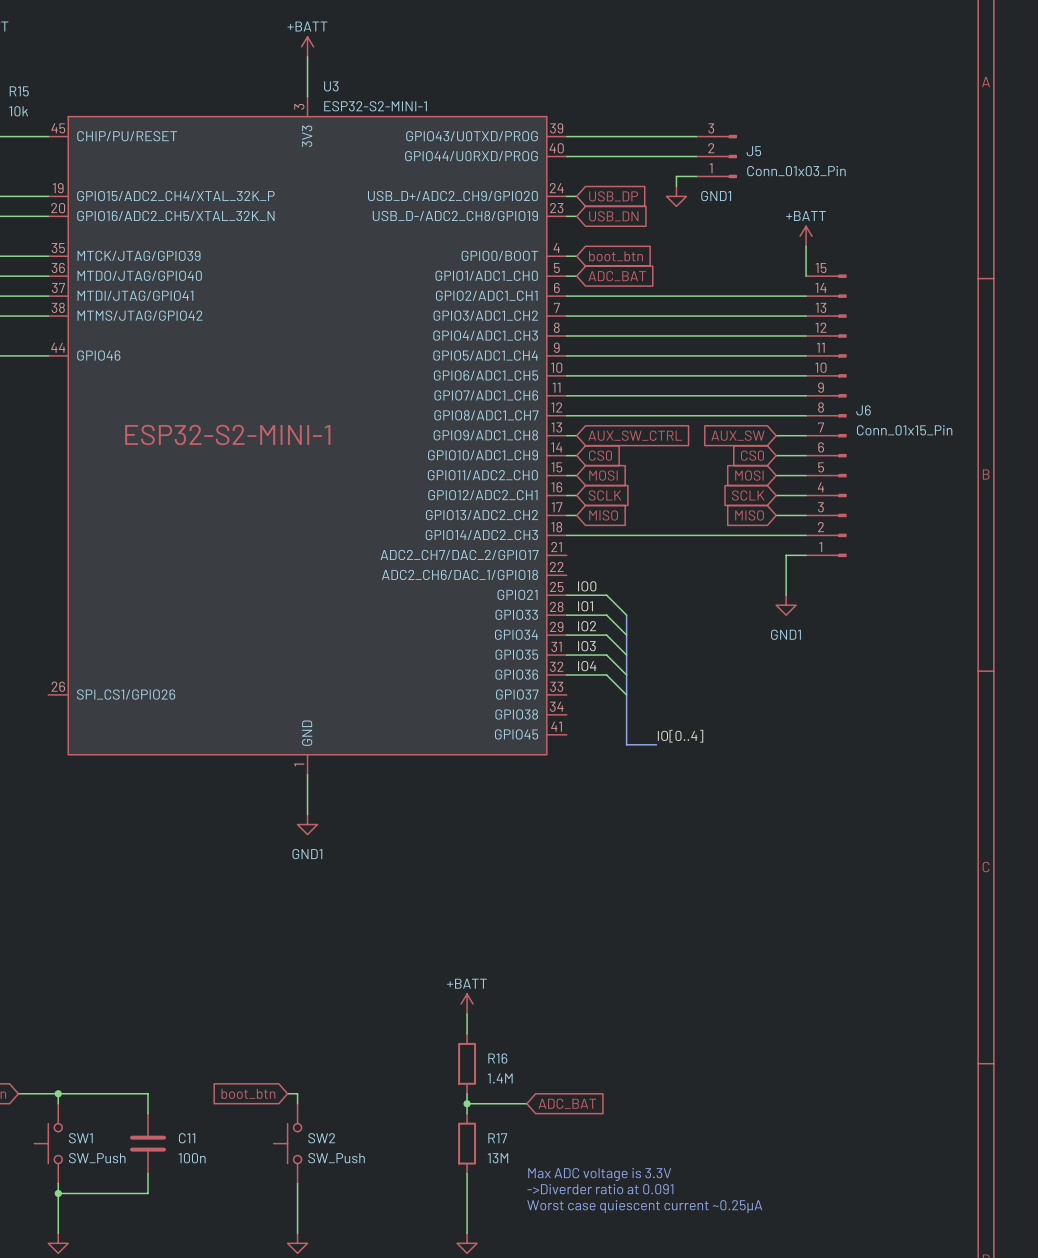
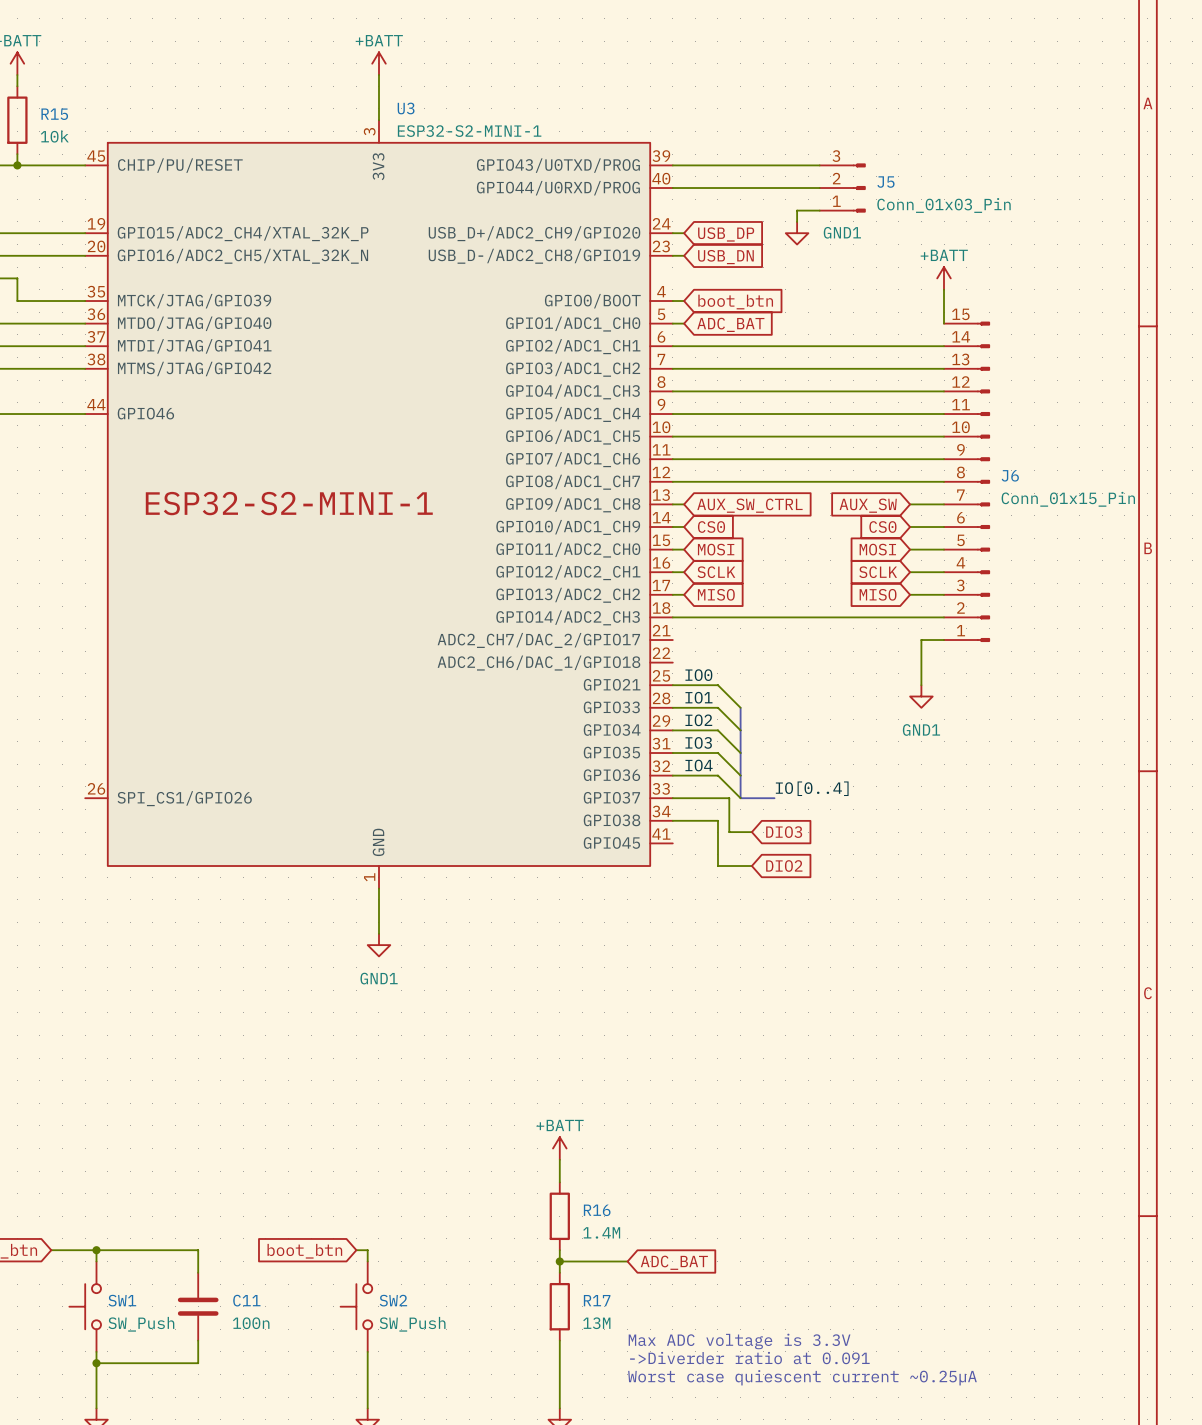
wire: none -> (672, 798) (729, 798) (729, 832) (751, 832)
bus: (626, 694) (626, 744) (656, 744) -> (740, 798) (774, 798)
wire: none -> (672, 820) (717, 820) (717, 866) (751, 866)
global label: none -> DIO3 (784, 832)
label position: IO[0..4] (680, 736) -> IO[0..4] (812, 788)
global label: none -> DIO2 (784, 866)

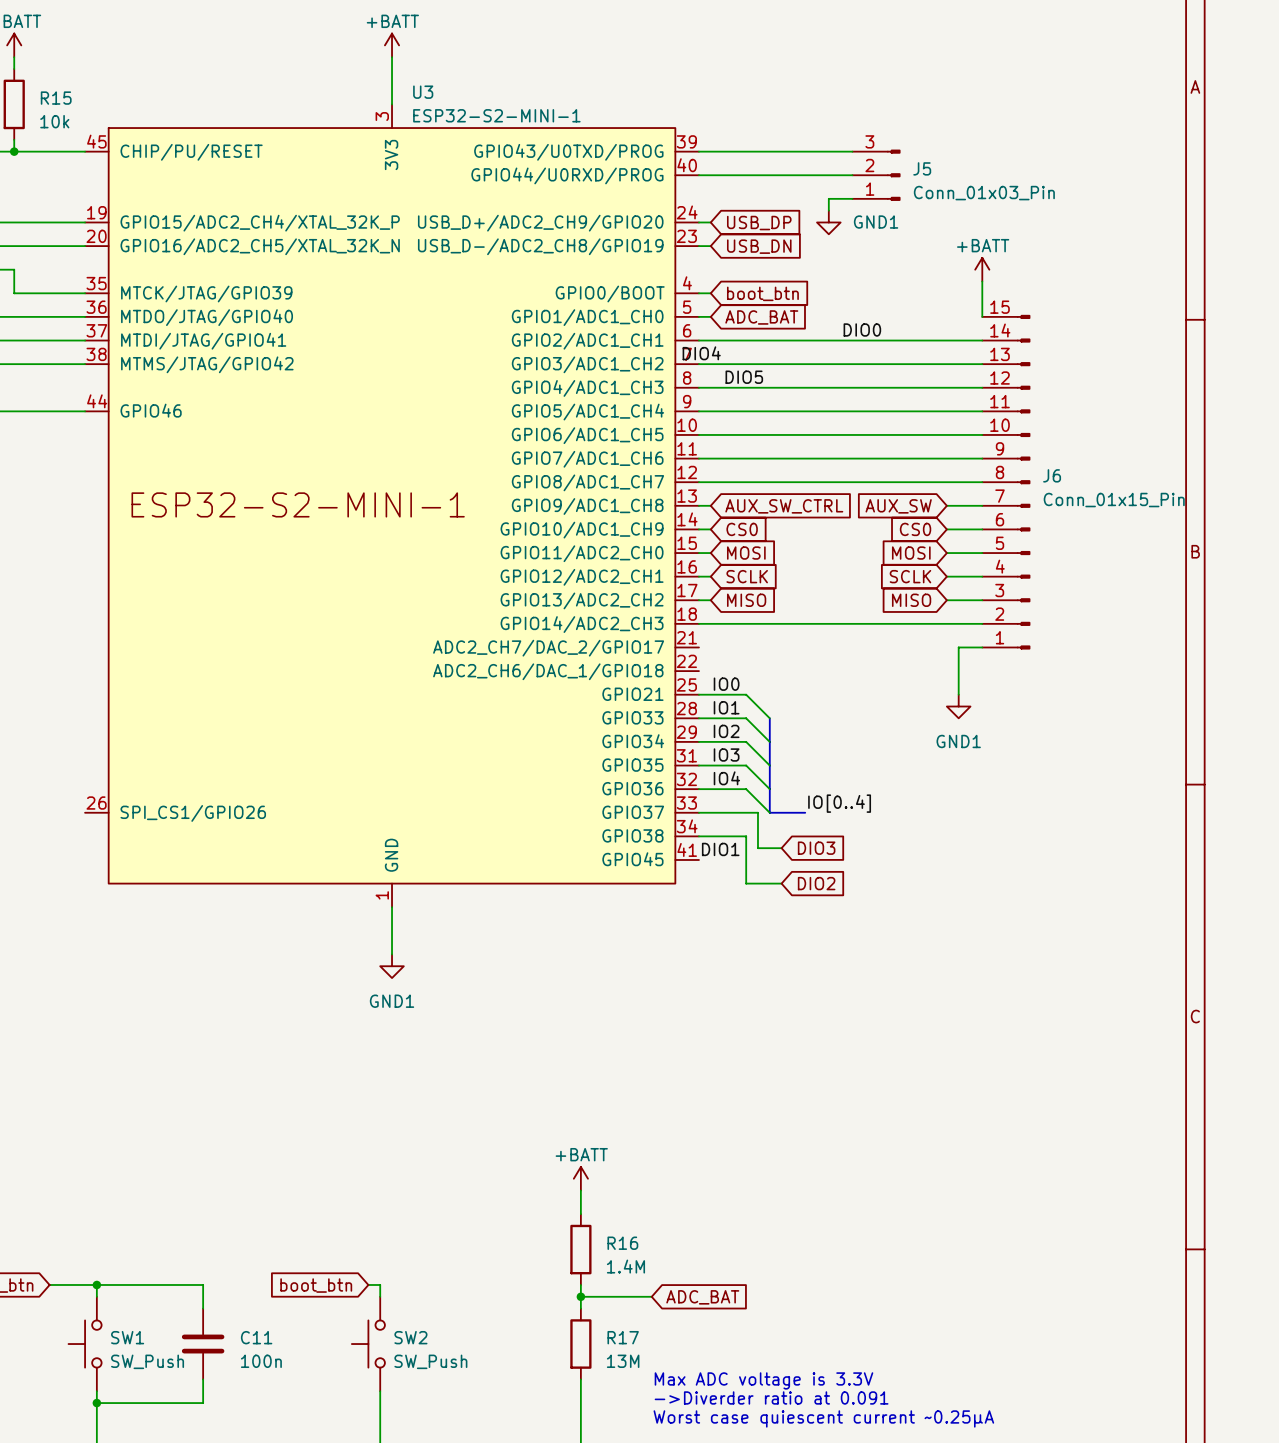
label: none -> DIO0 (862, 329)
label: none -> DIO4 (701, 353)
label: none -> DIO5 (744, 377)
label: none -> DIO1 (720, 849)

